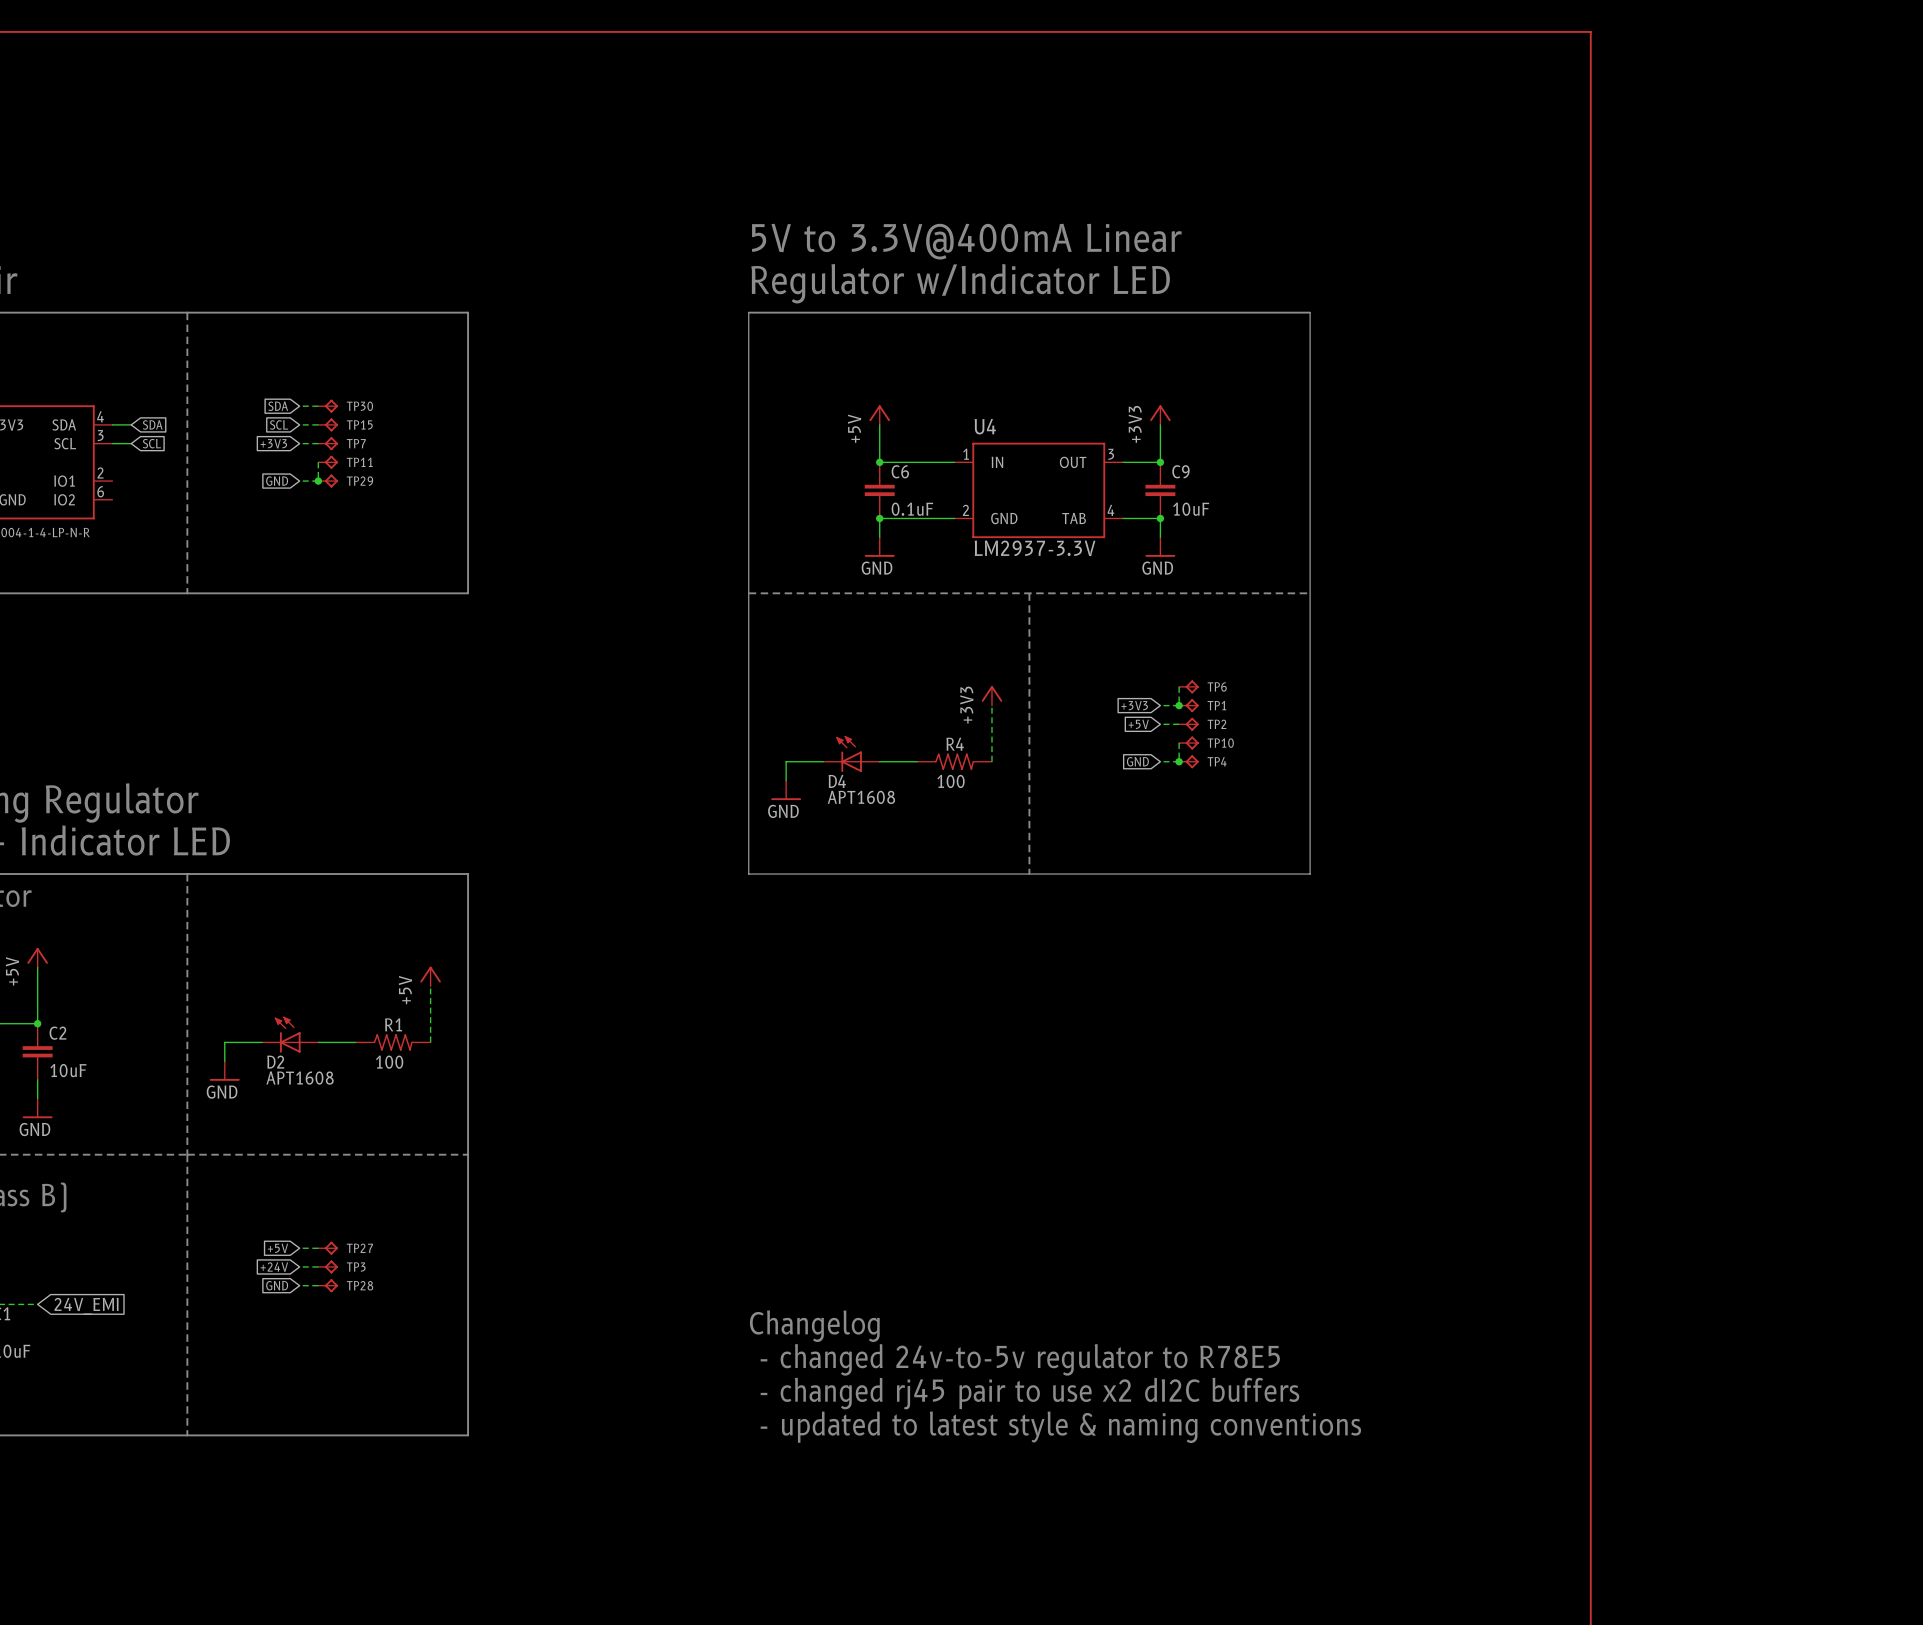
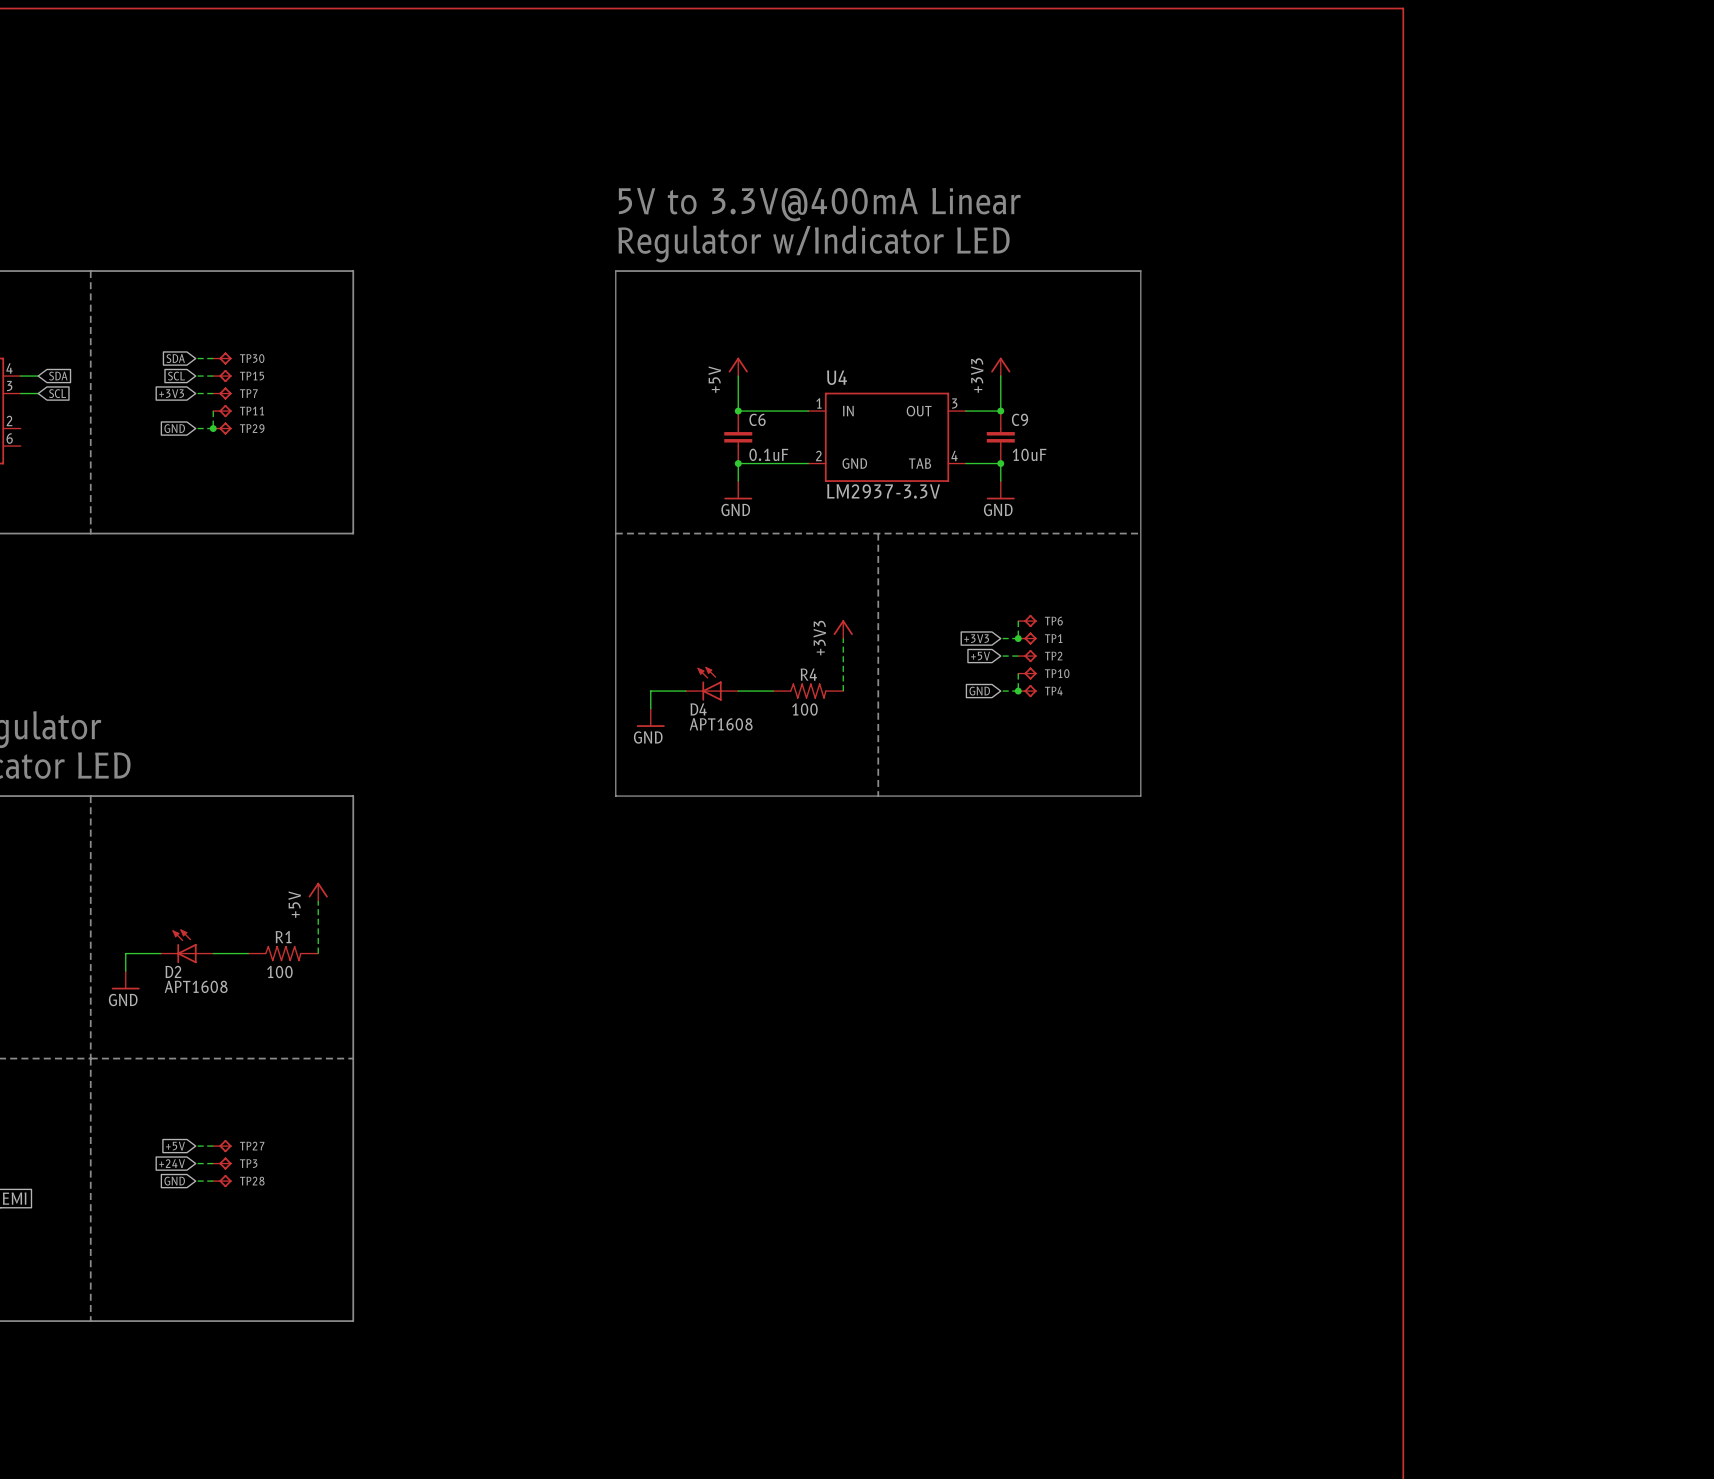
text: Changelog (814, 1326) -> none
text: - changed 24v-to-5v regulator to R78E5 (1020, 1359) -> none
text: - changed rj45 pair to use x2 dI2C buffers (1029, 1393) -> none
text: - updated to latest style & naming conventions (1060, 1427) -> none

